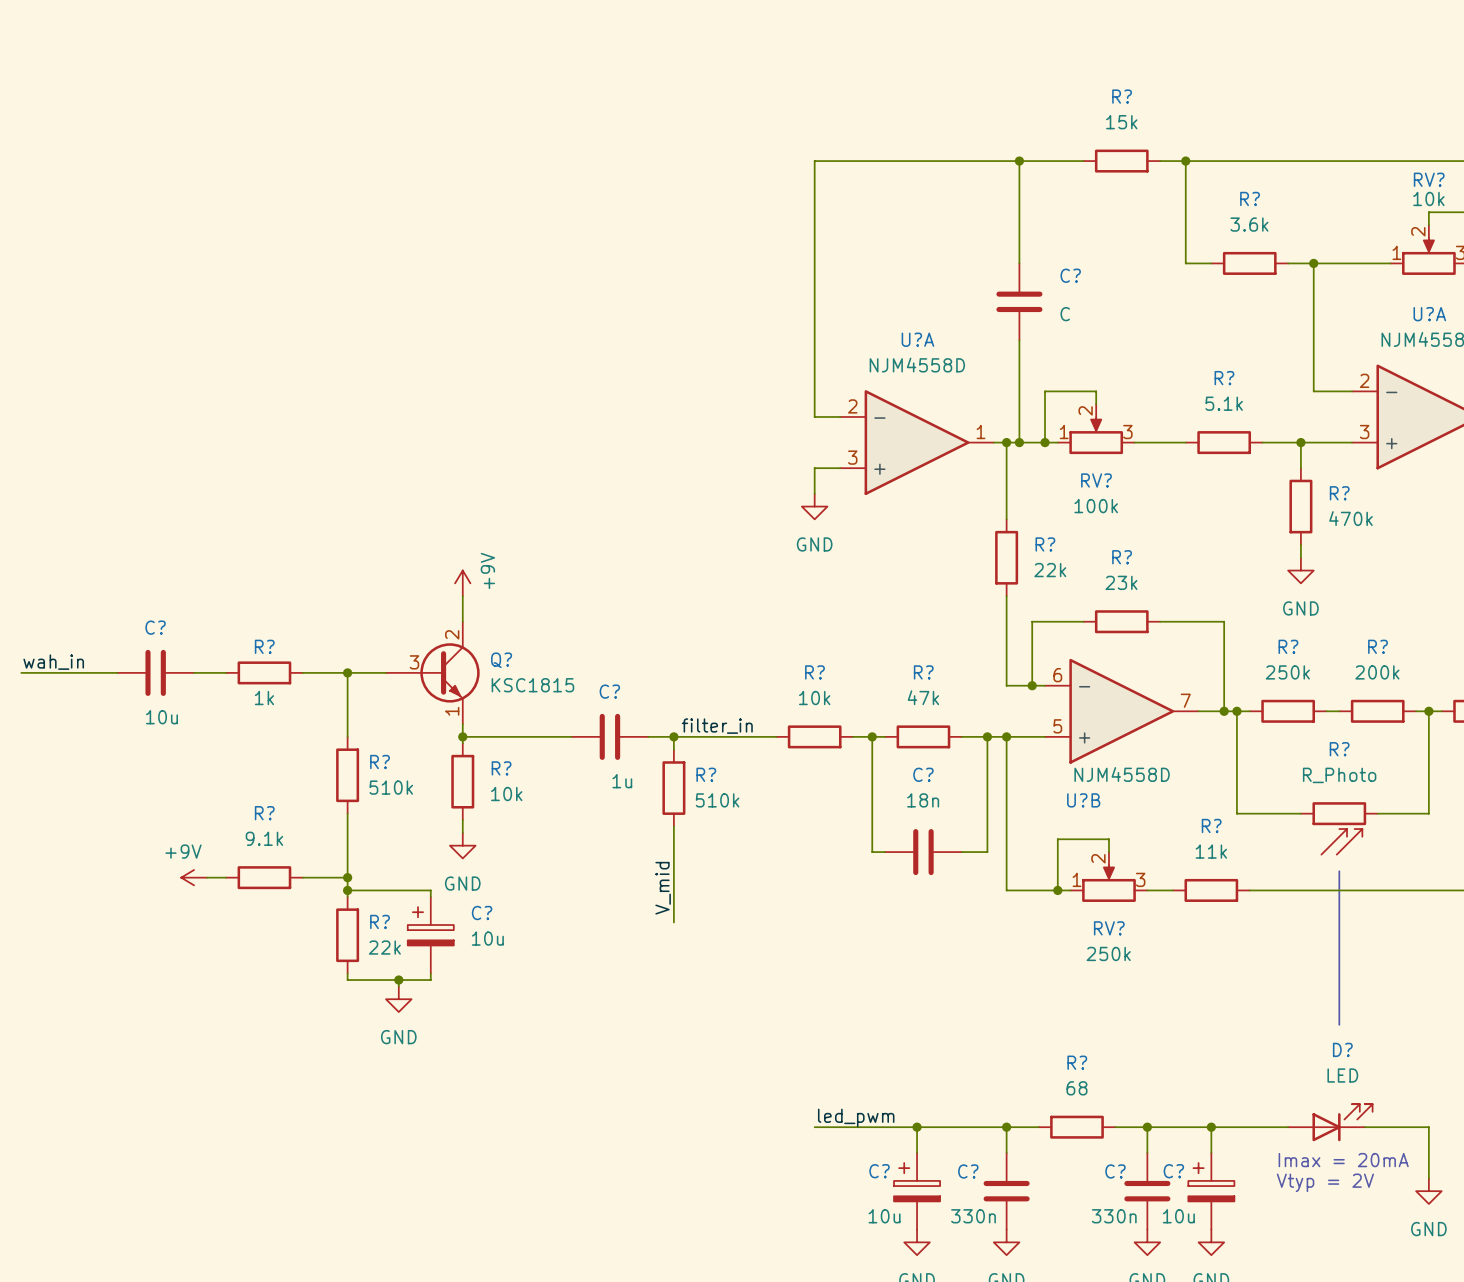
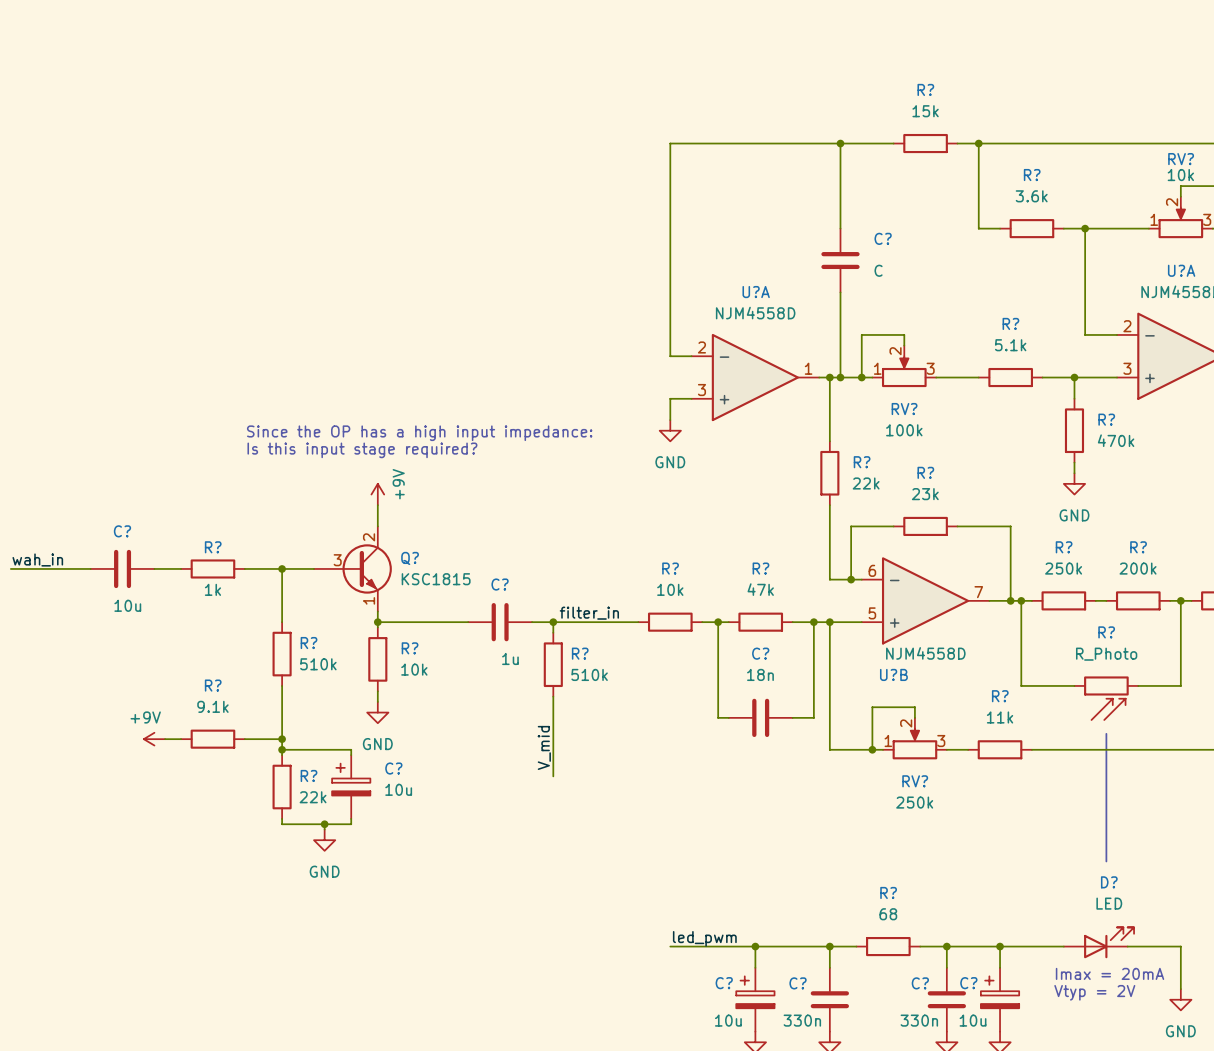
text: none -> Since the OP has a high input impedance: (419, 433)
text: none -> Is this input stage required? (362, 450)

